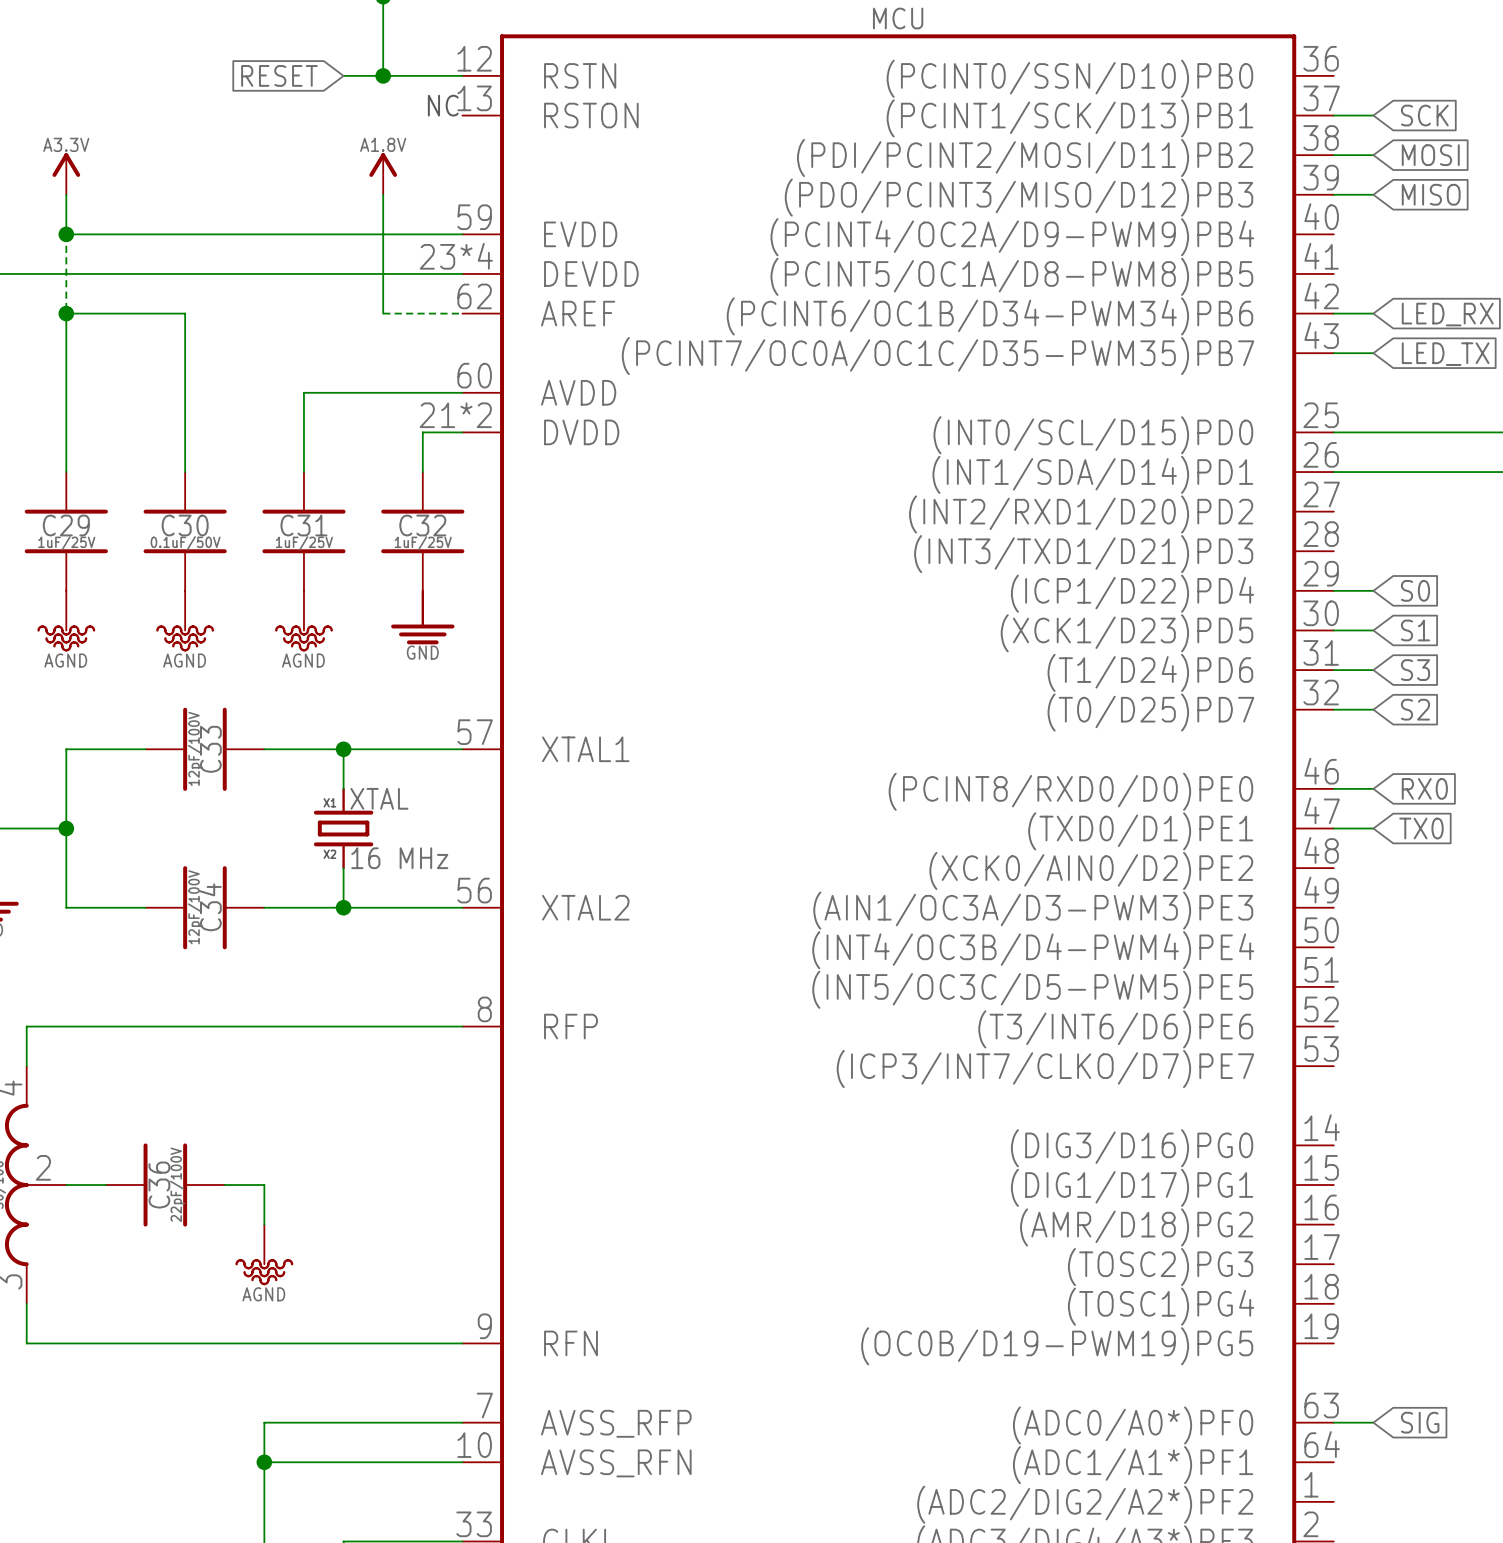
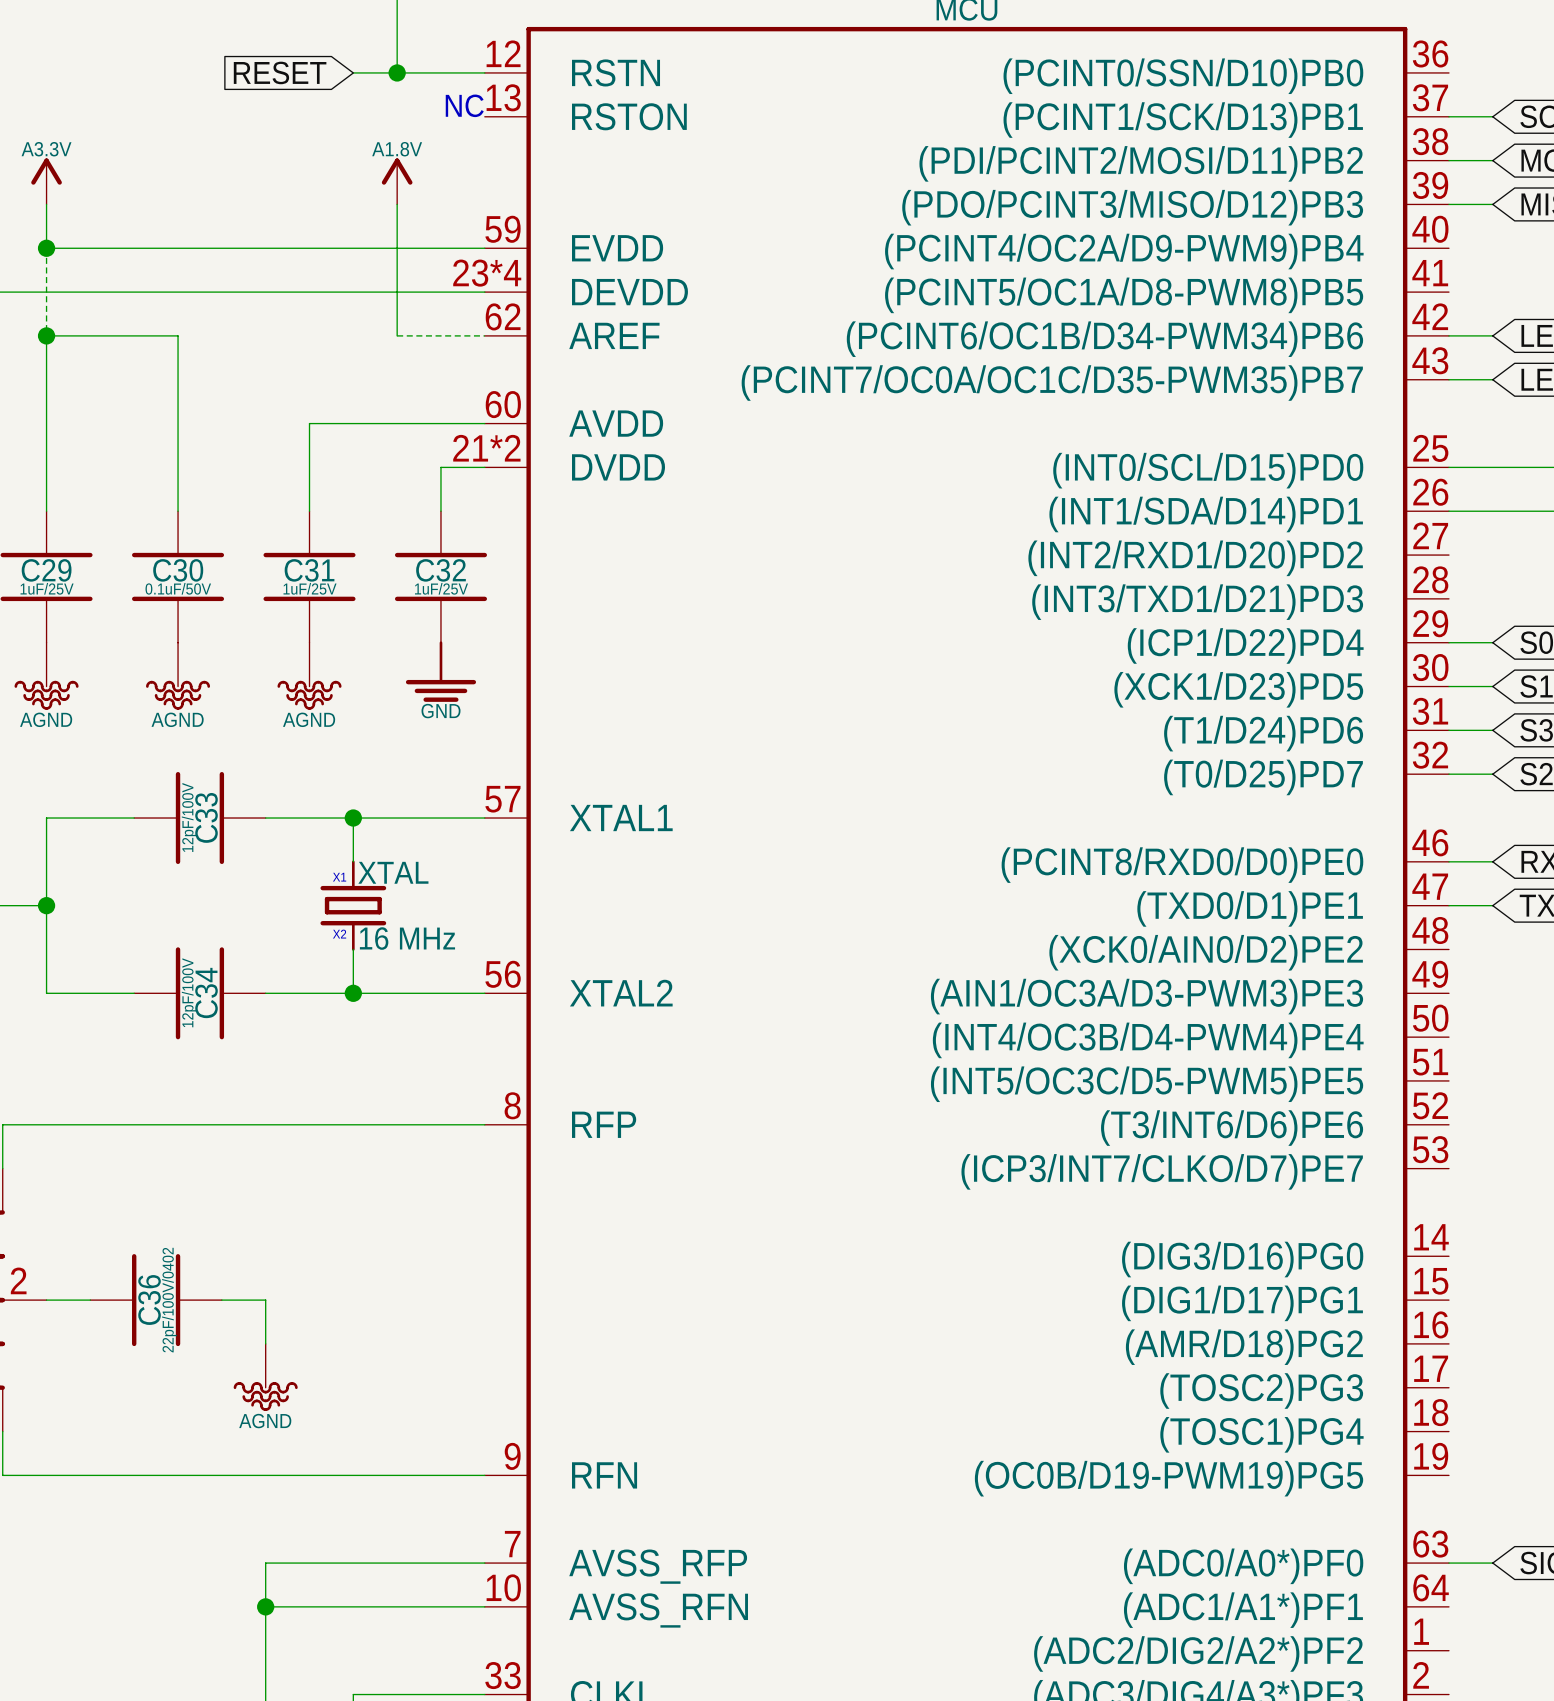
C36 value: 22pF/100V (177, 1184) -> 22pF/100V/0402 (169, 1300)

